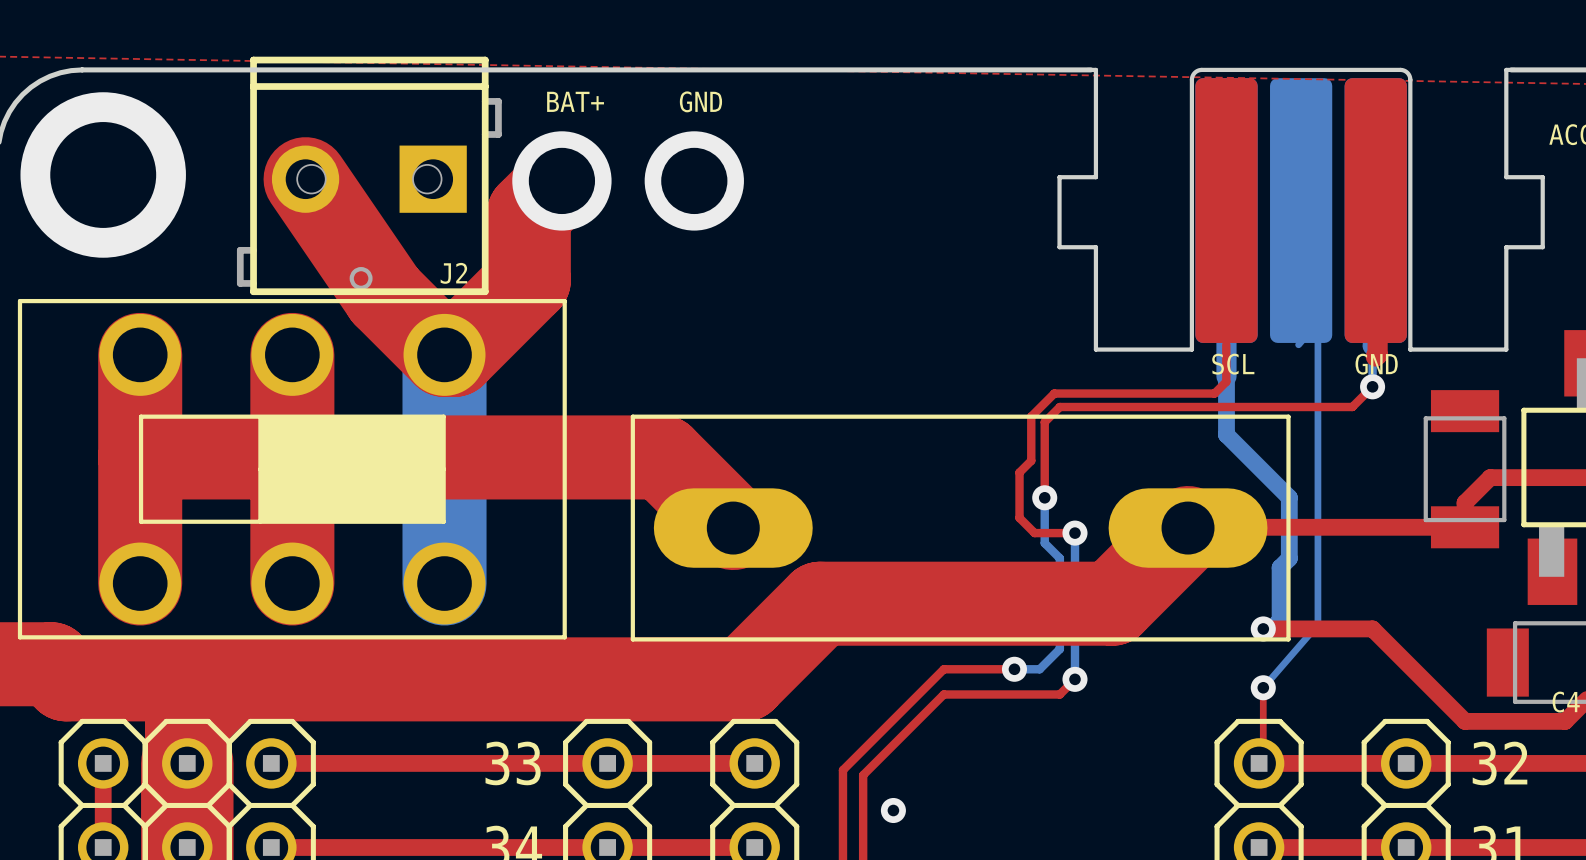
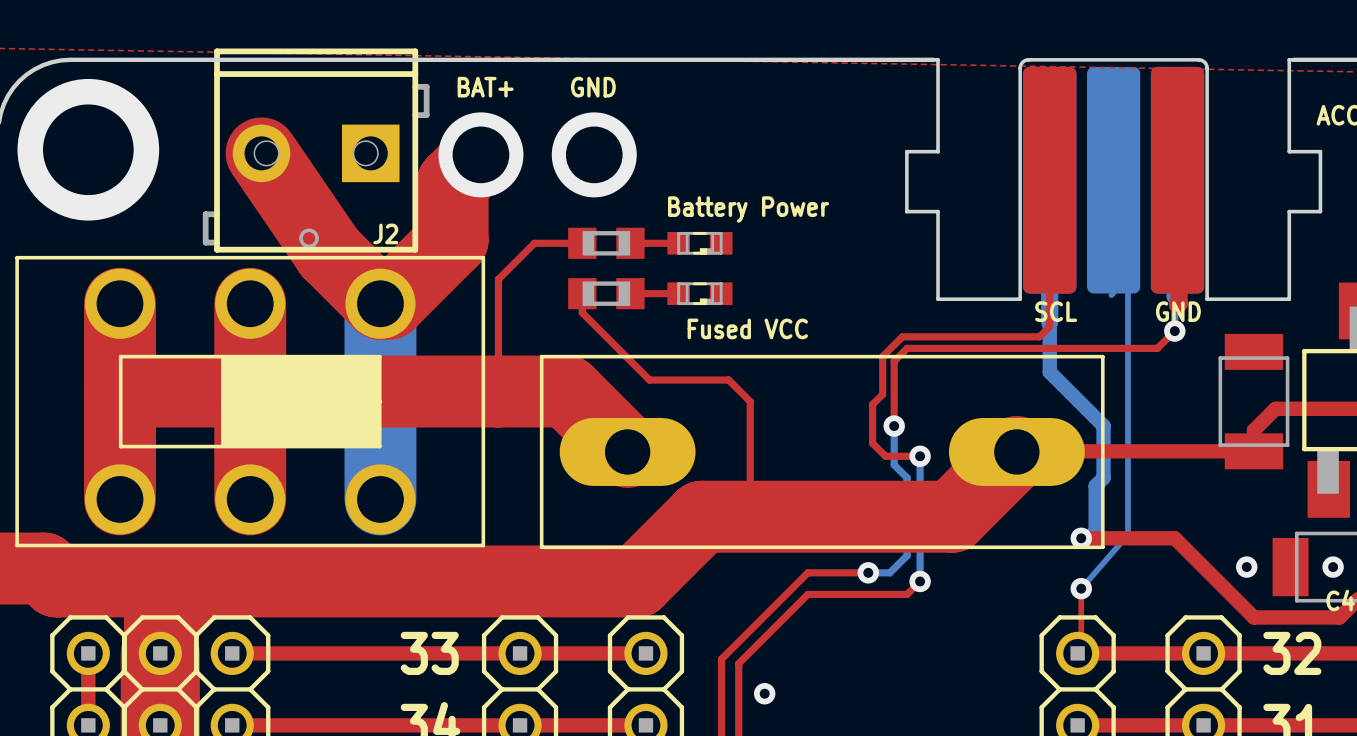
text: none -> Battery Power (748, 209)
top track: none -> (582, 243) (534, 243) (498, 279) (498, 391)
part: none -> (606, 243)
top track: none -> (630, 243) (678, 243)
part: none -> (699, 243)
top track: none -> (582, 293) (582, 312) (649, 380) (728, 380) (750, 401) (750, 502) (735, 516) (701, 516)
part: none -> (606, 293)
top track: none -> (630, 293) (678, 293)
part: none -> (699, 293)
text: none -> Fused VCC (747, 328)
via: none -> (1246, 567)
via: none -> (1333, 567)

